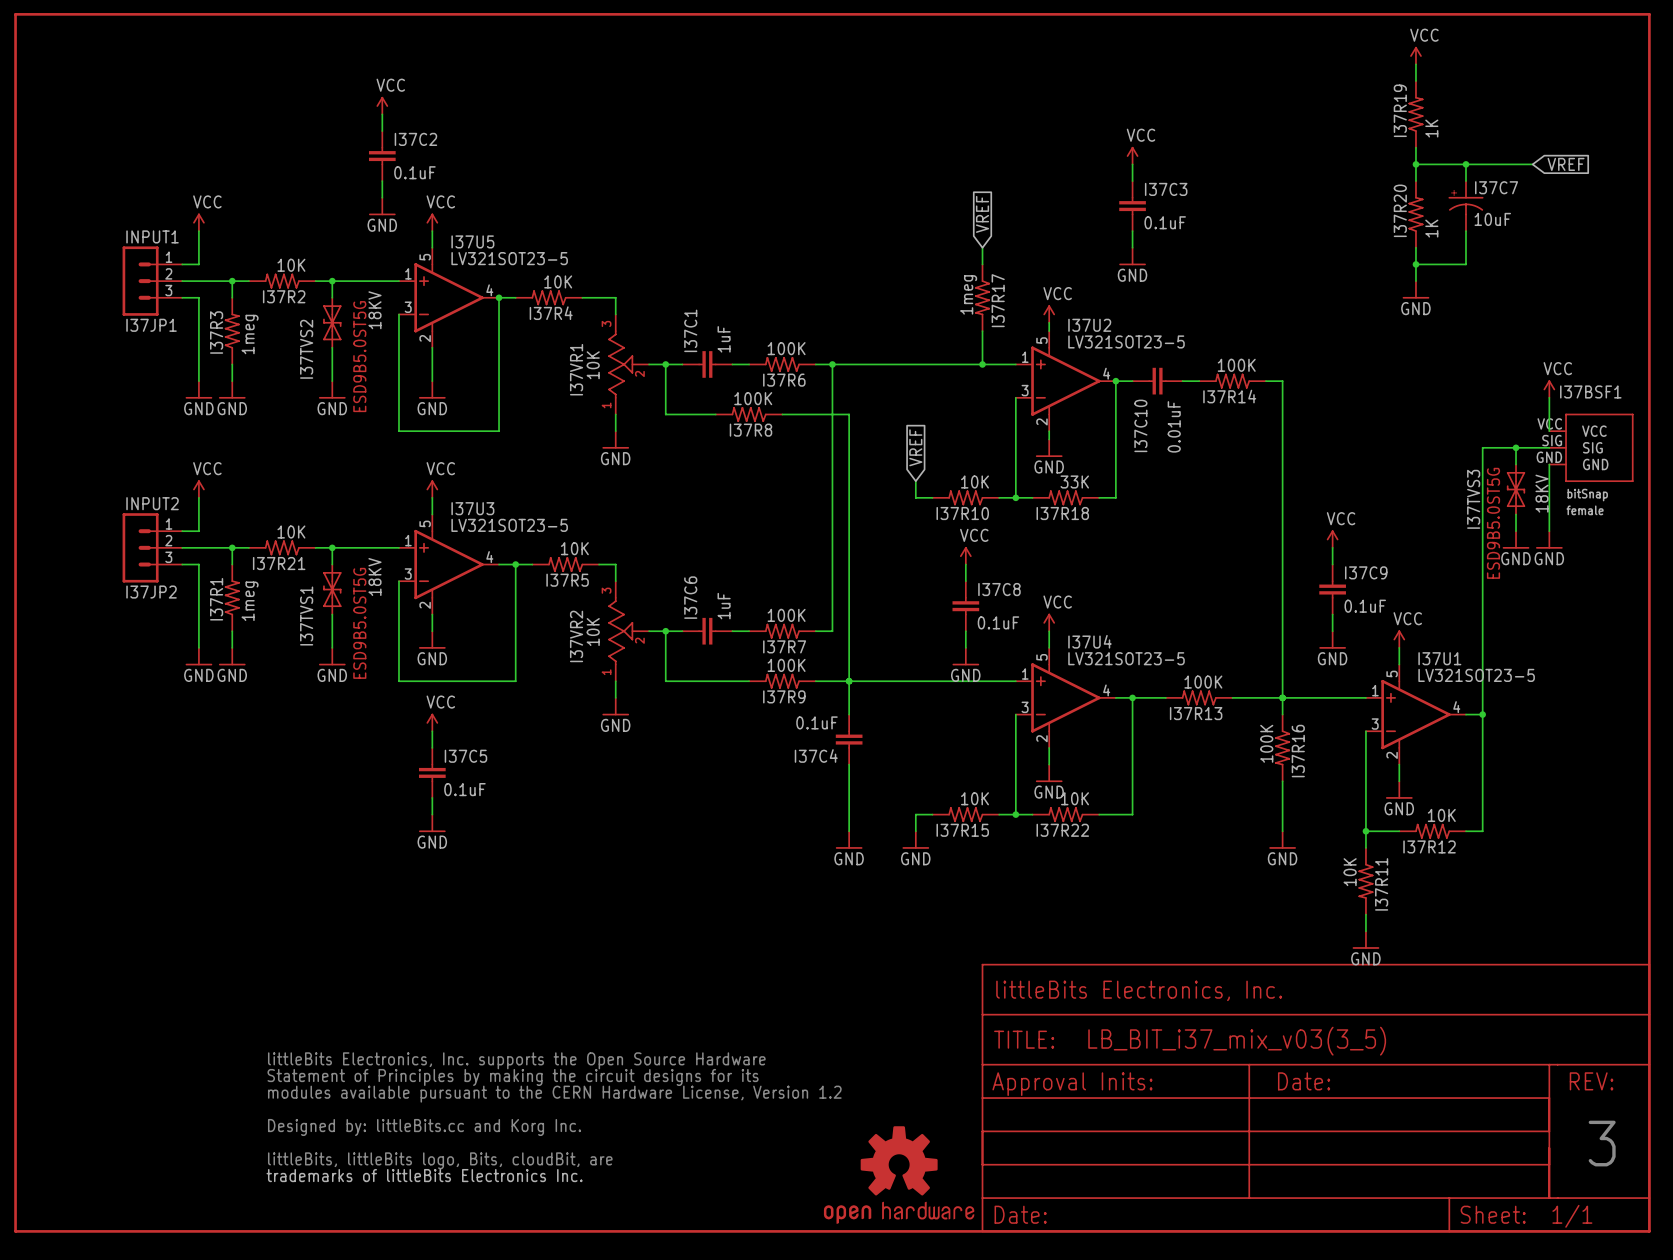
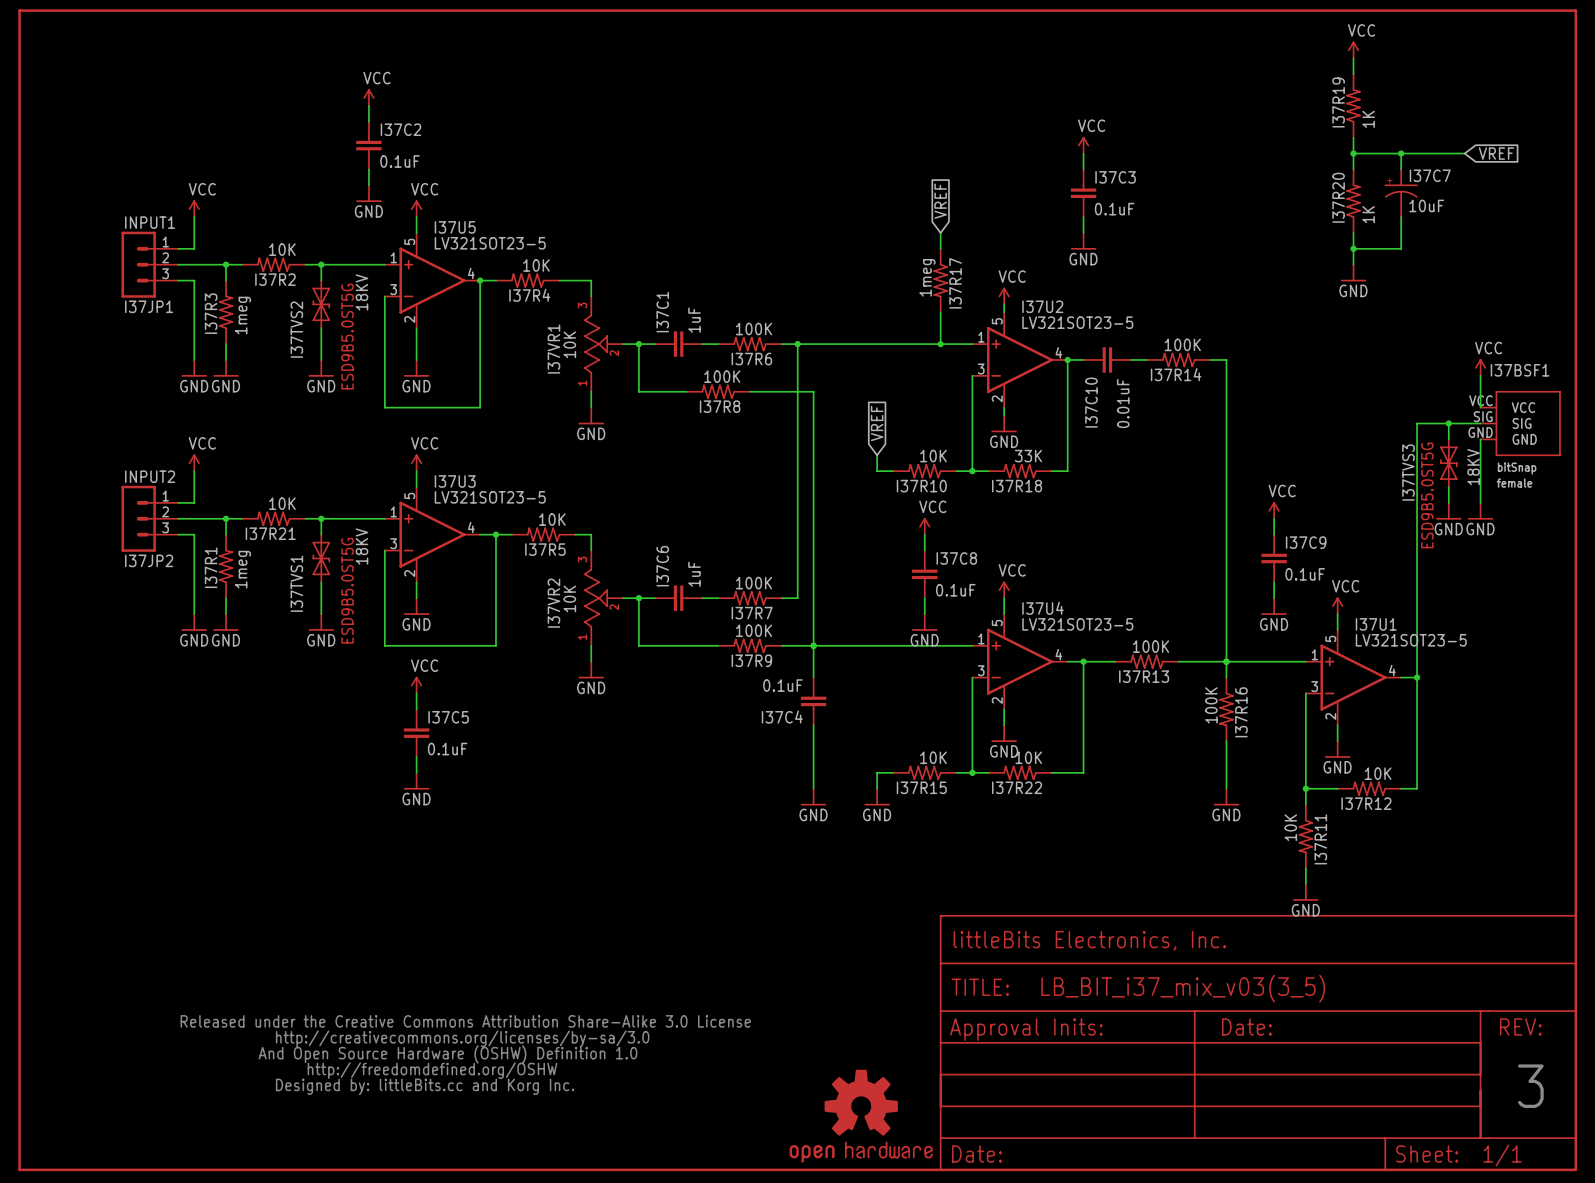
part: none -> (465, 1055)
part: (554, 1117) -> none

